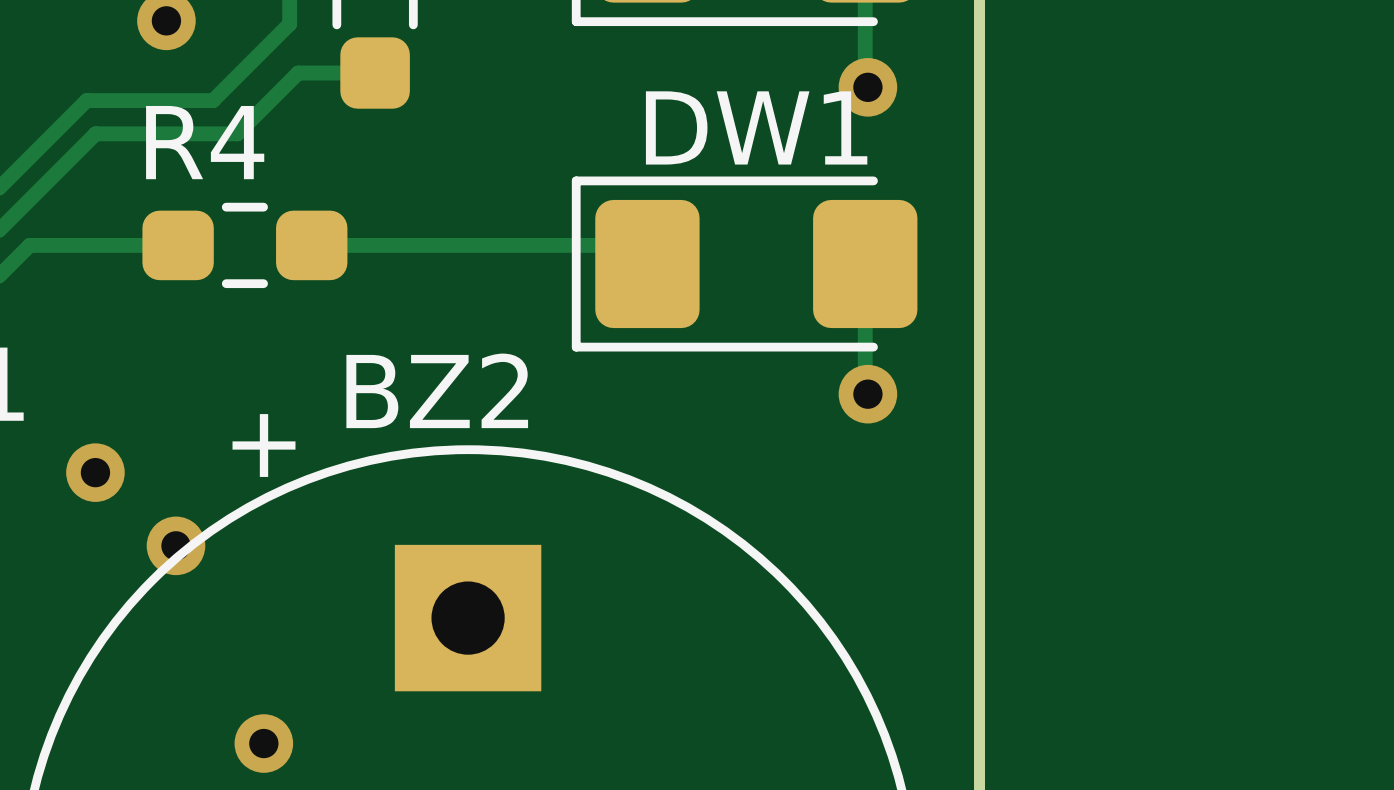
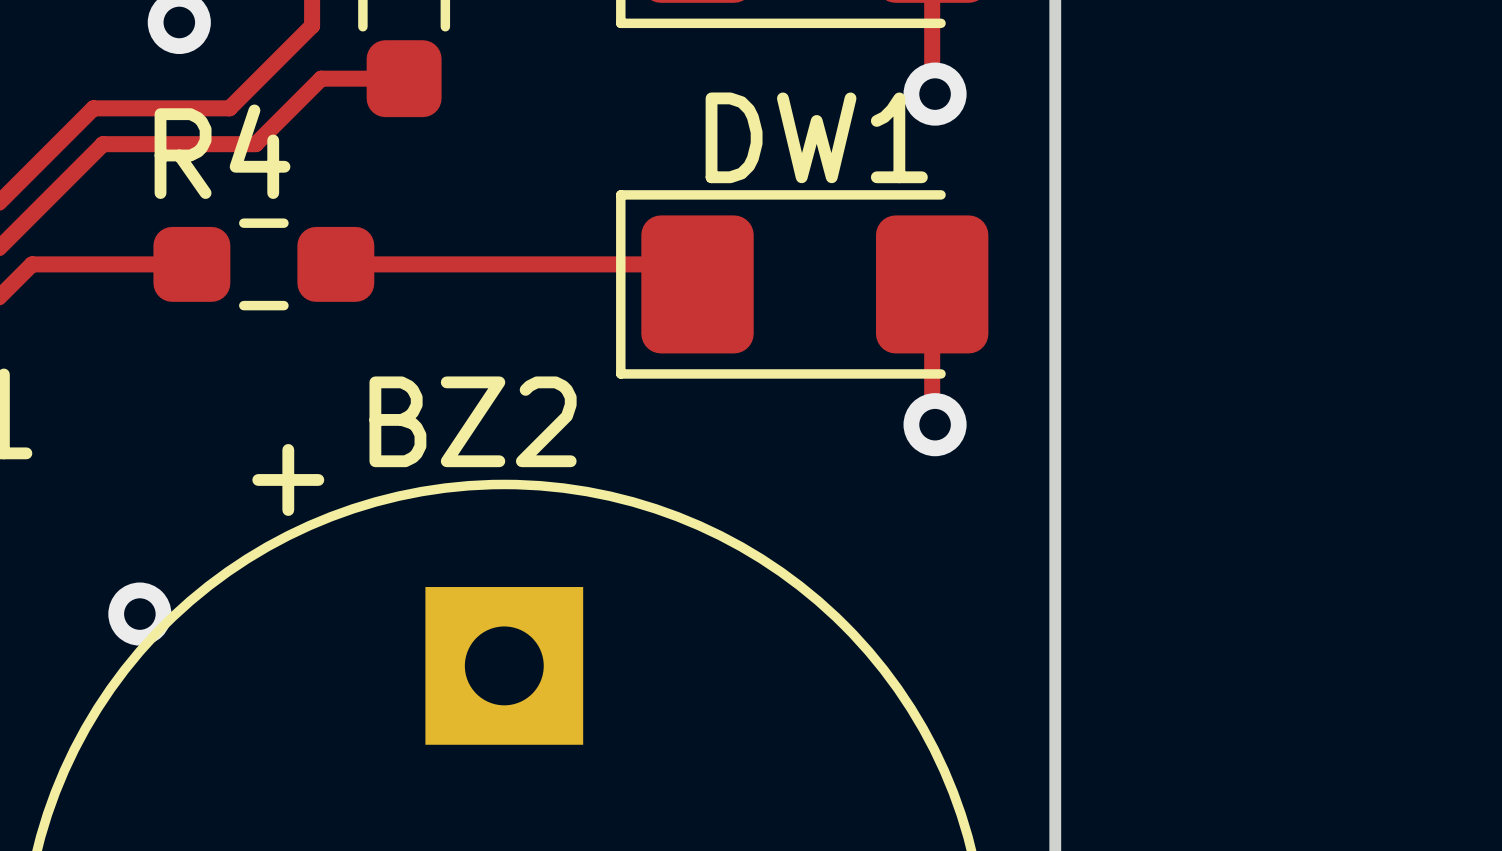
via: (95, 472) -> none
via position: (175, 545) -> (139, 614)
via: (263, 743) -> none

